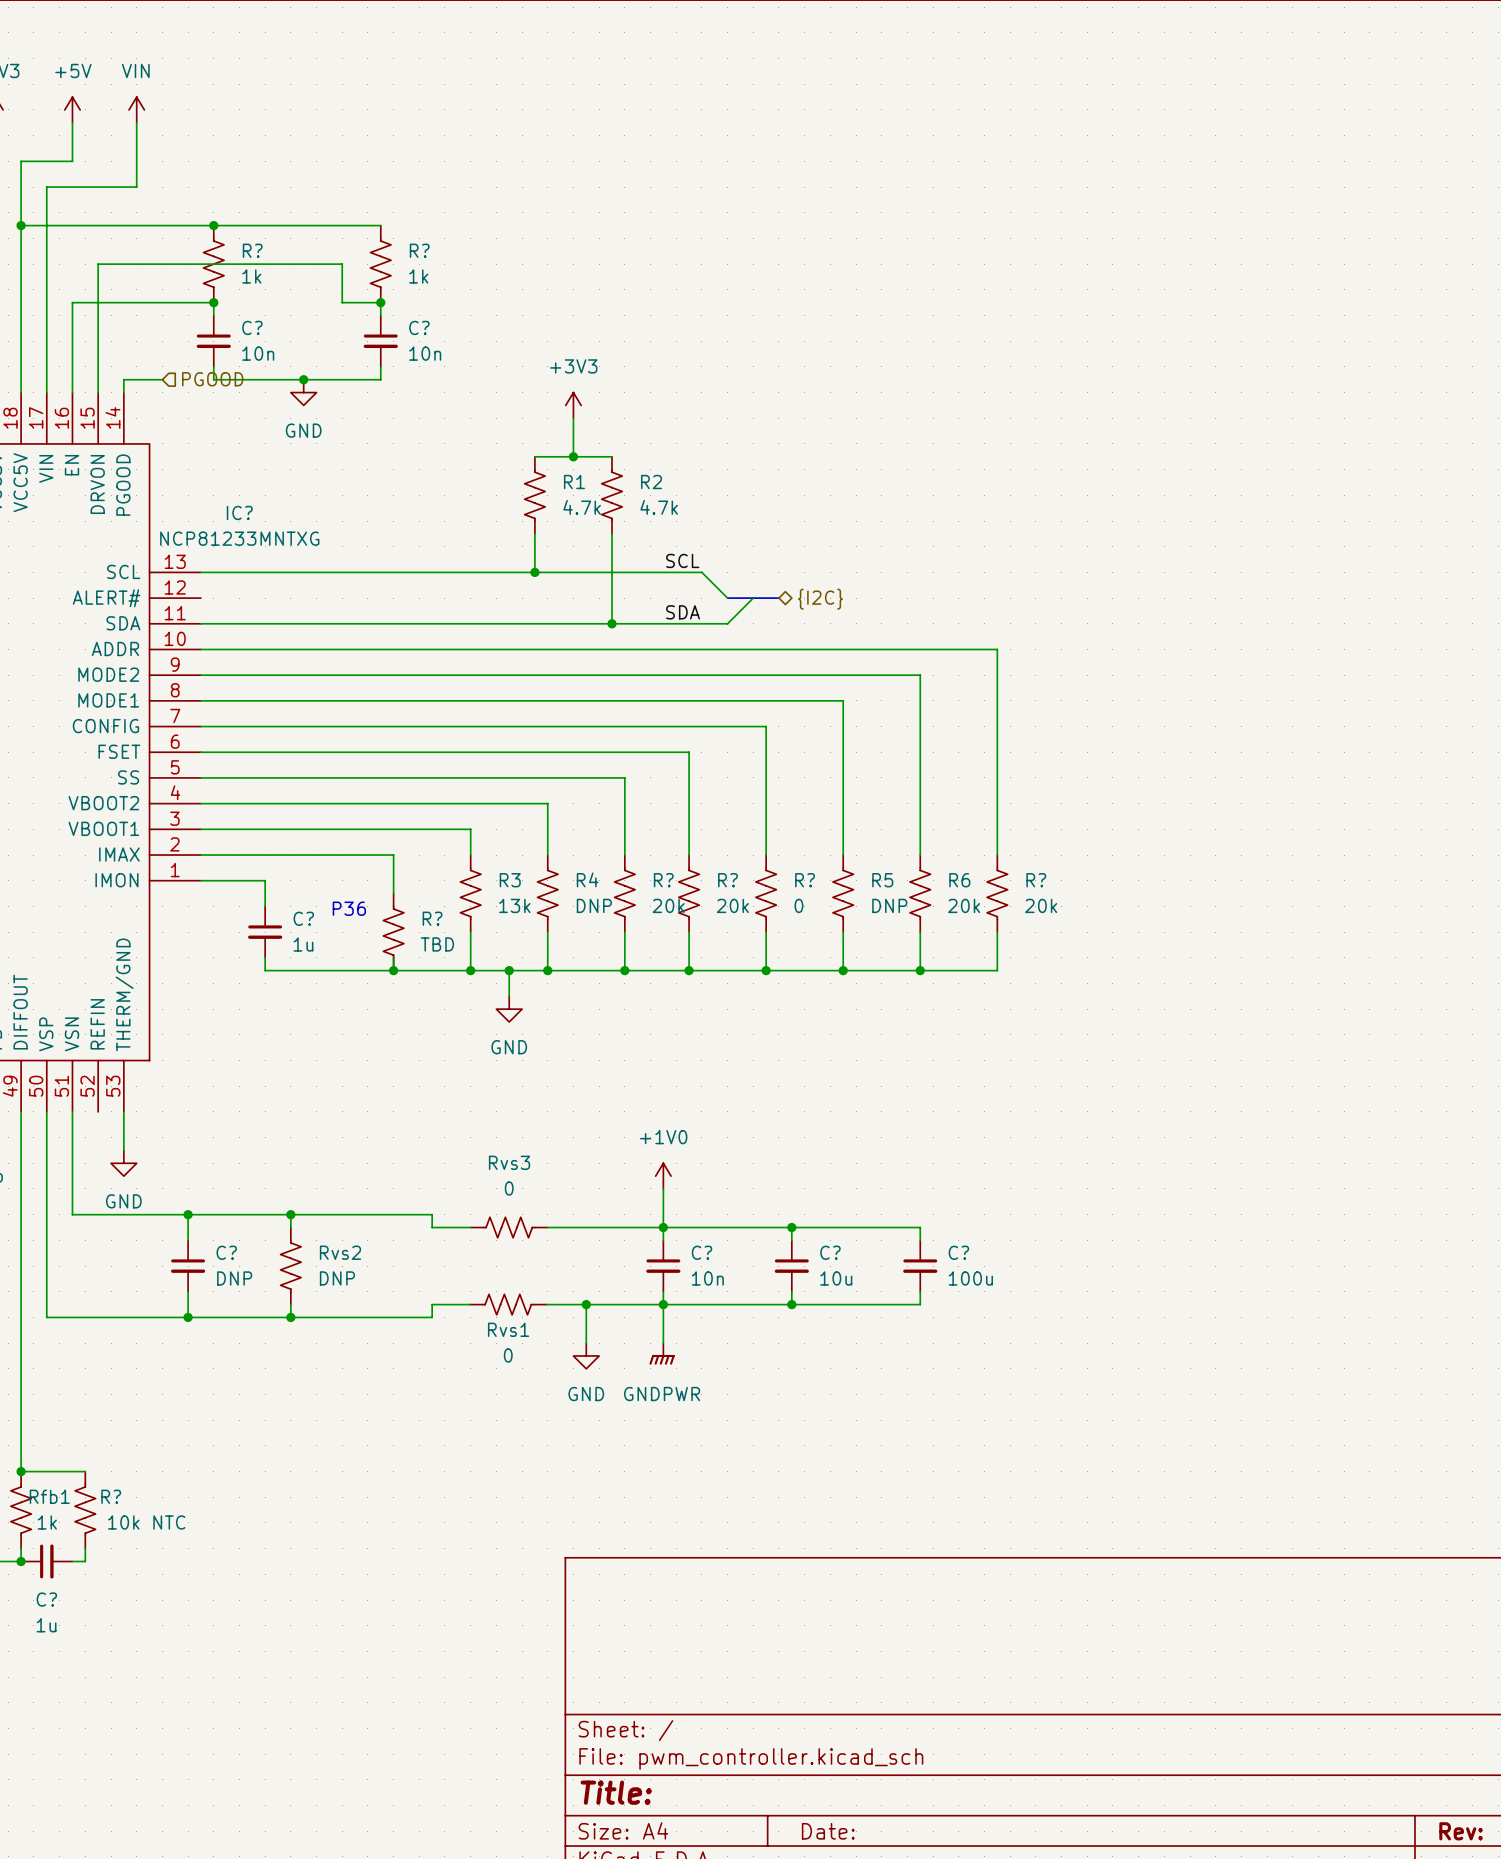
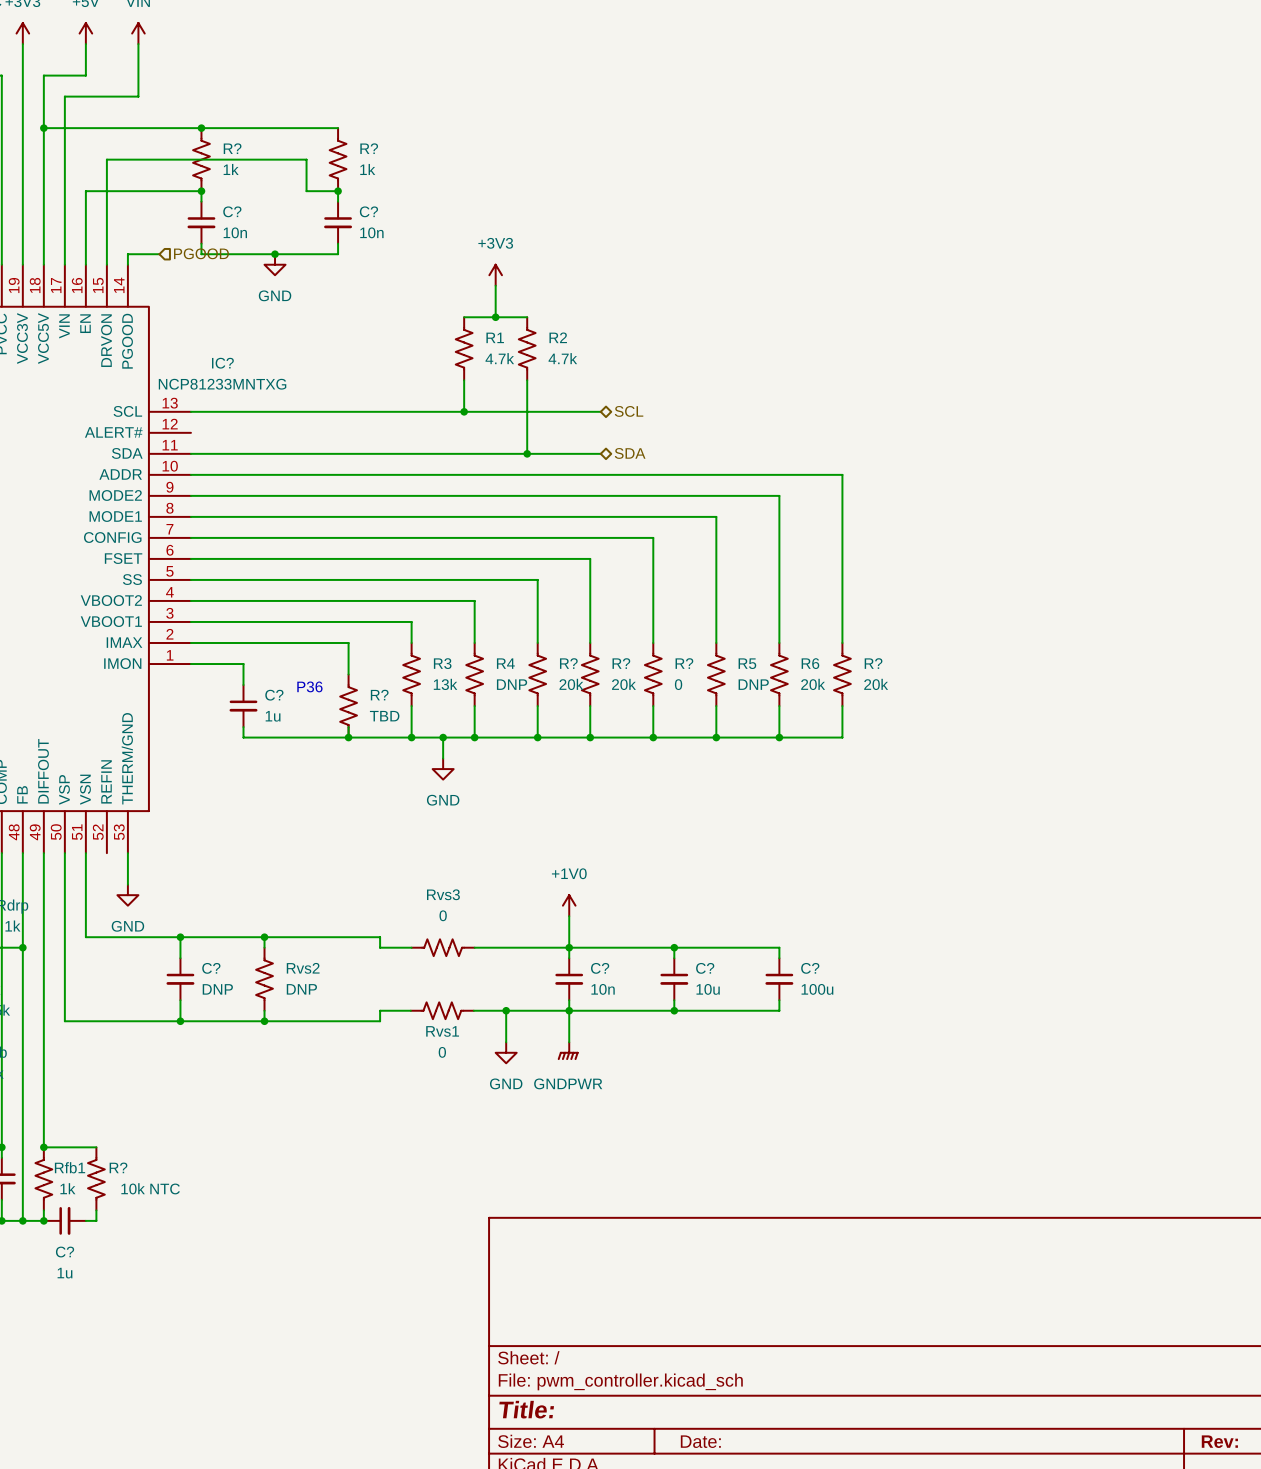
label: SCL (682, 560) -> none
hierarchical label: none -> SCL (629, 411)
wire: (701, 572) (727, 598) -> none
bus: (727, 598) (778, 598) -> none
wire: (753, 598) (727, 623) (701, 623) -> none
hierarchical label: {I2C} (820, 599) -> none
label: SDA (683, 612) -> none
hierarchical label: none -> SDA (630, 453)

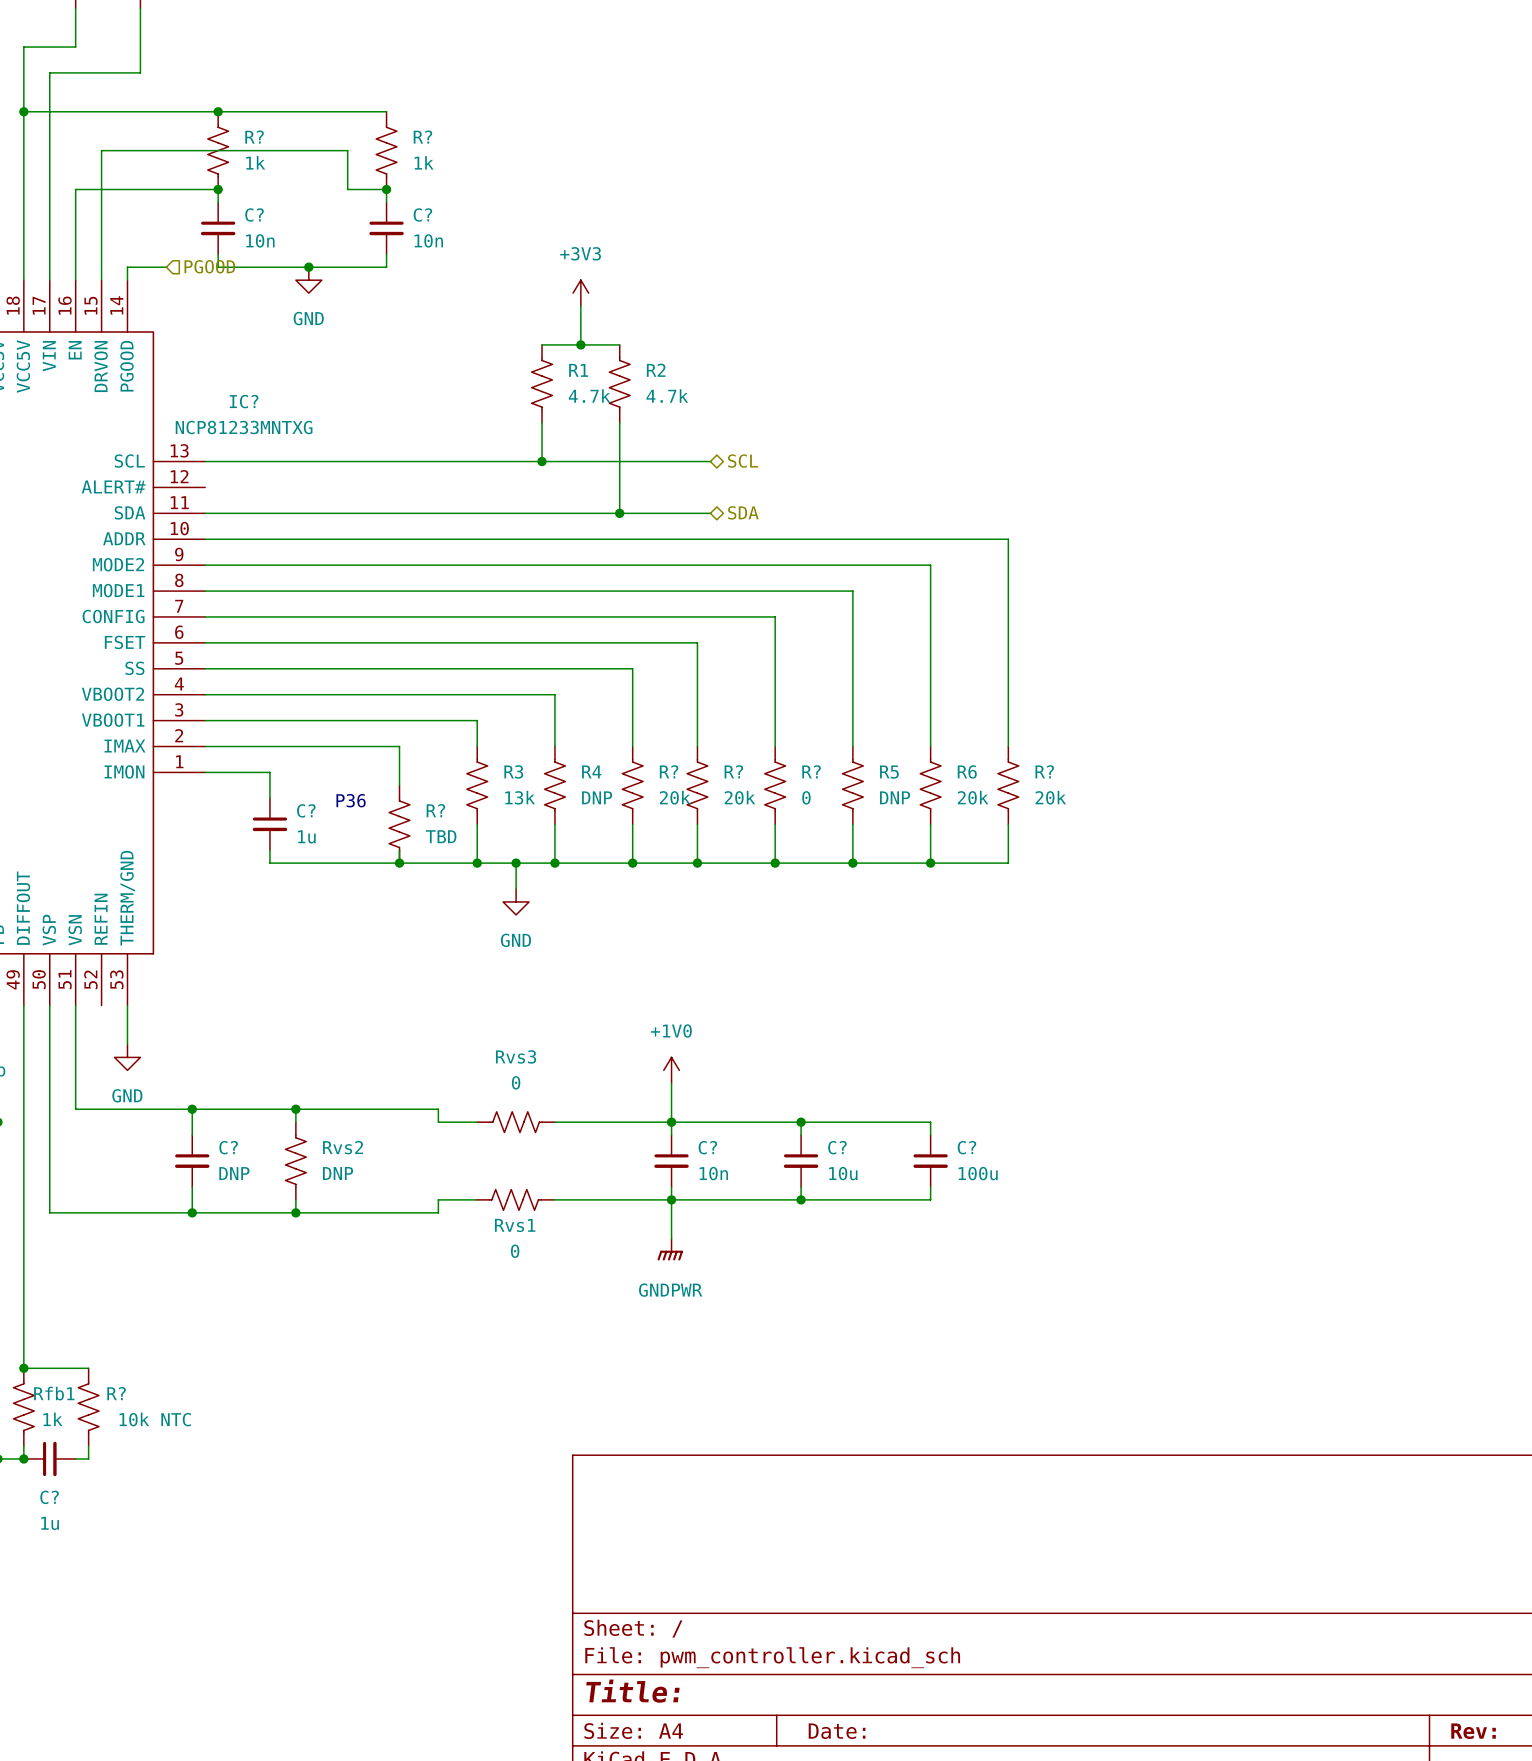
wire: (506, 1010) (506, 1042) -> none
junction: (506, 1010) -> none
power symbol: GND (506, 1052) -> none

